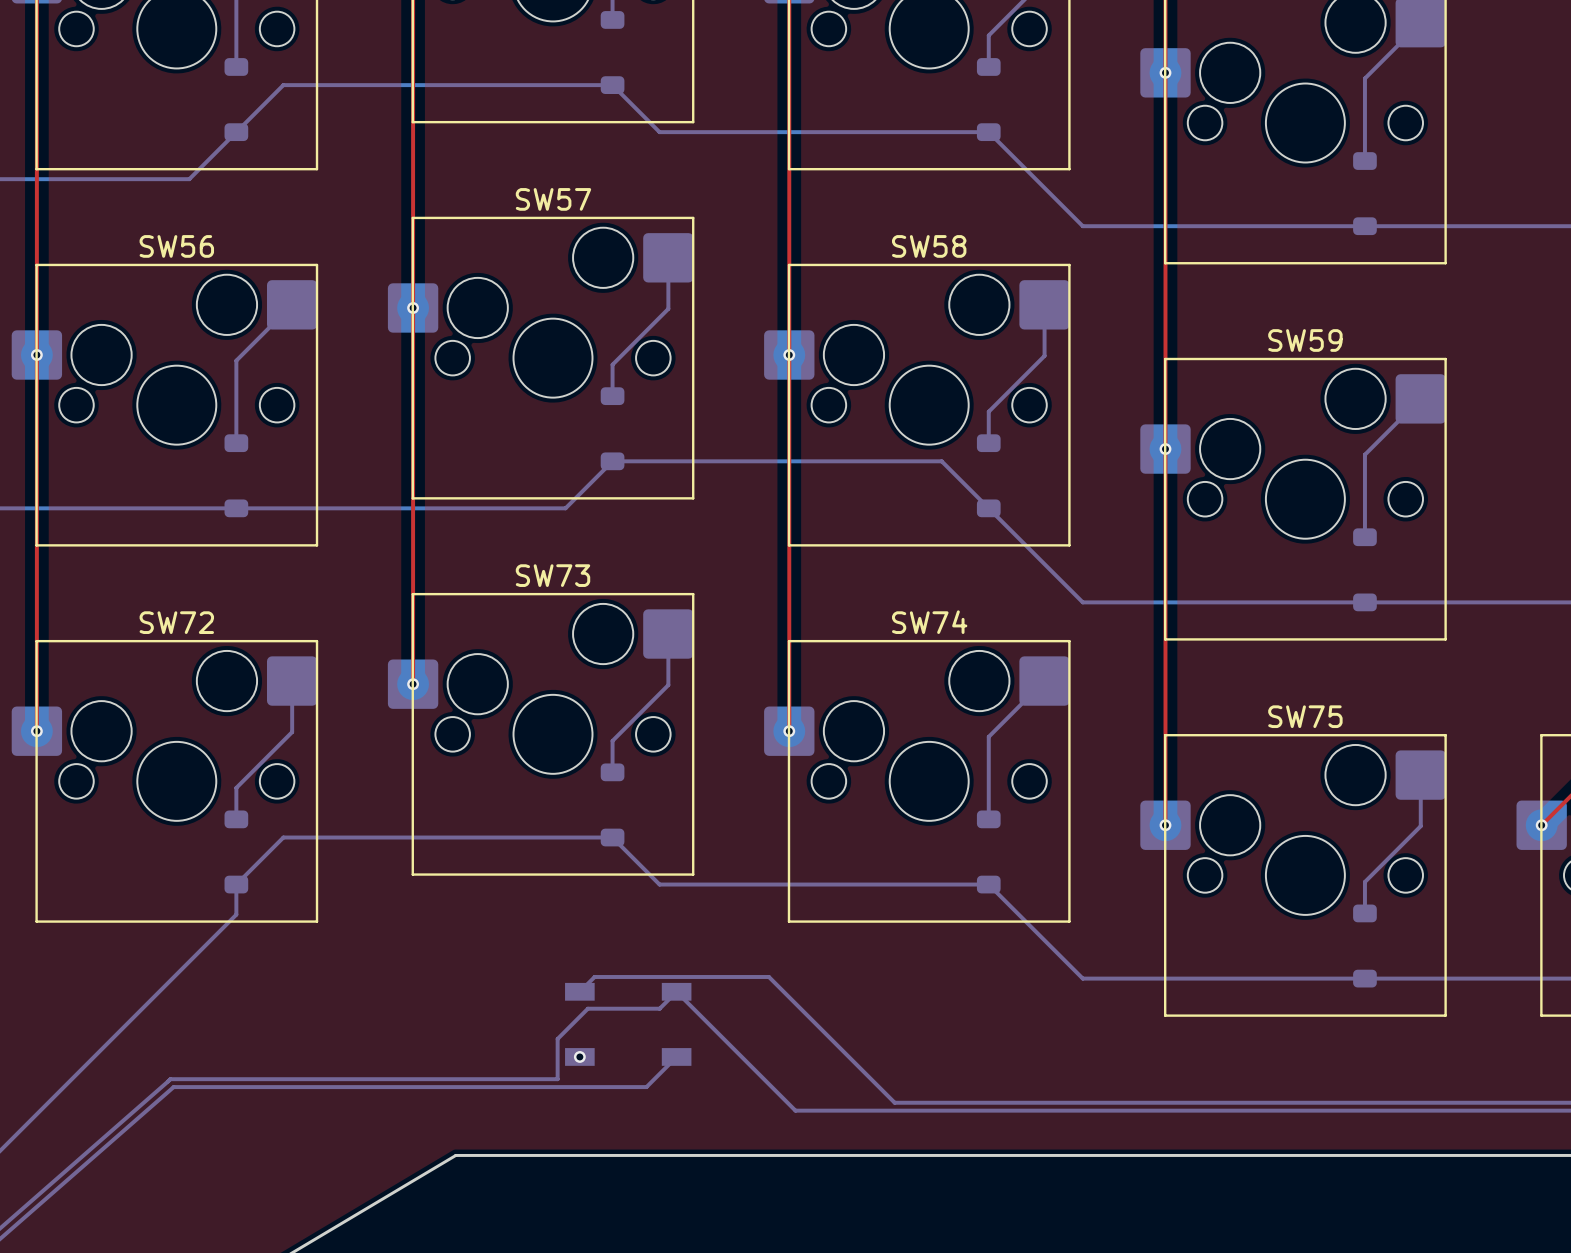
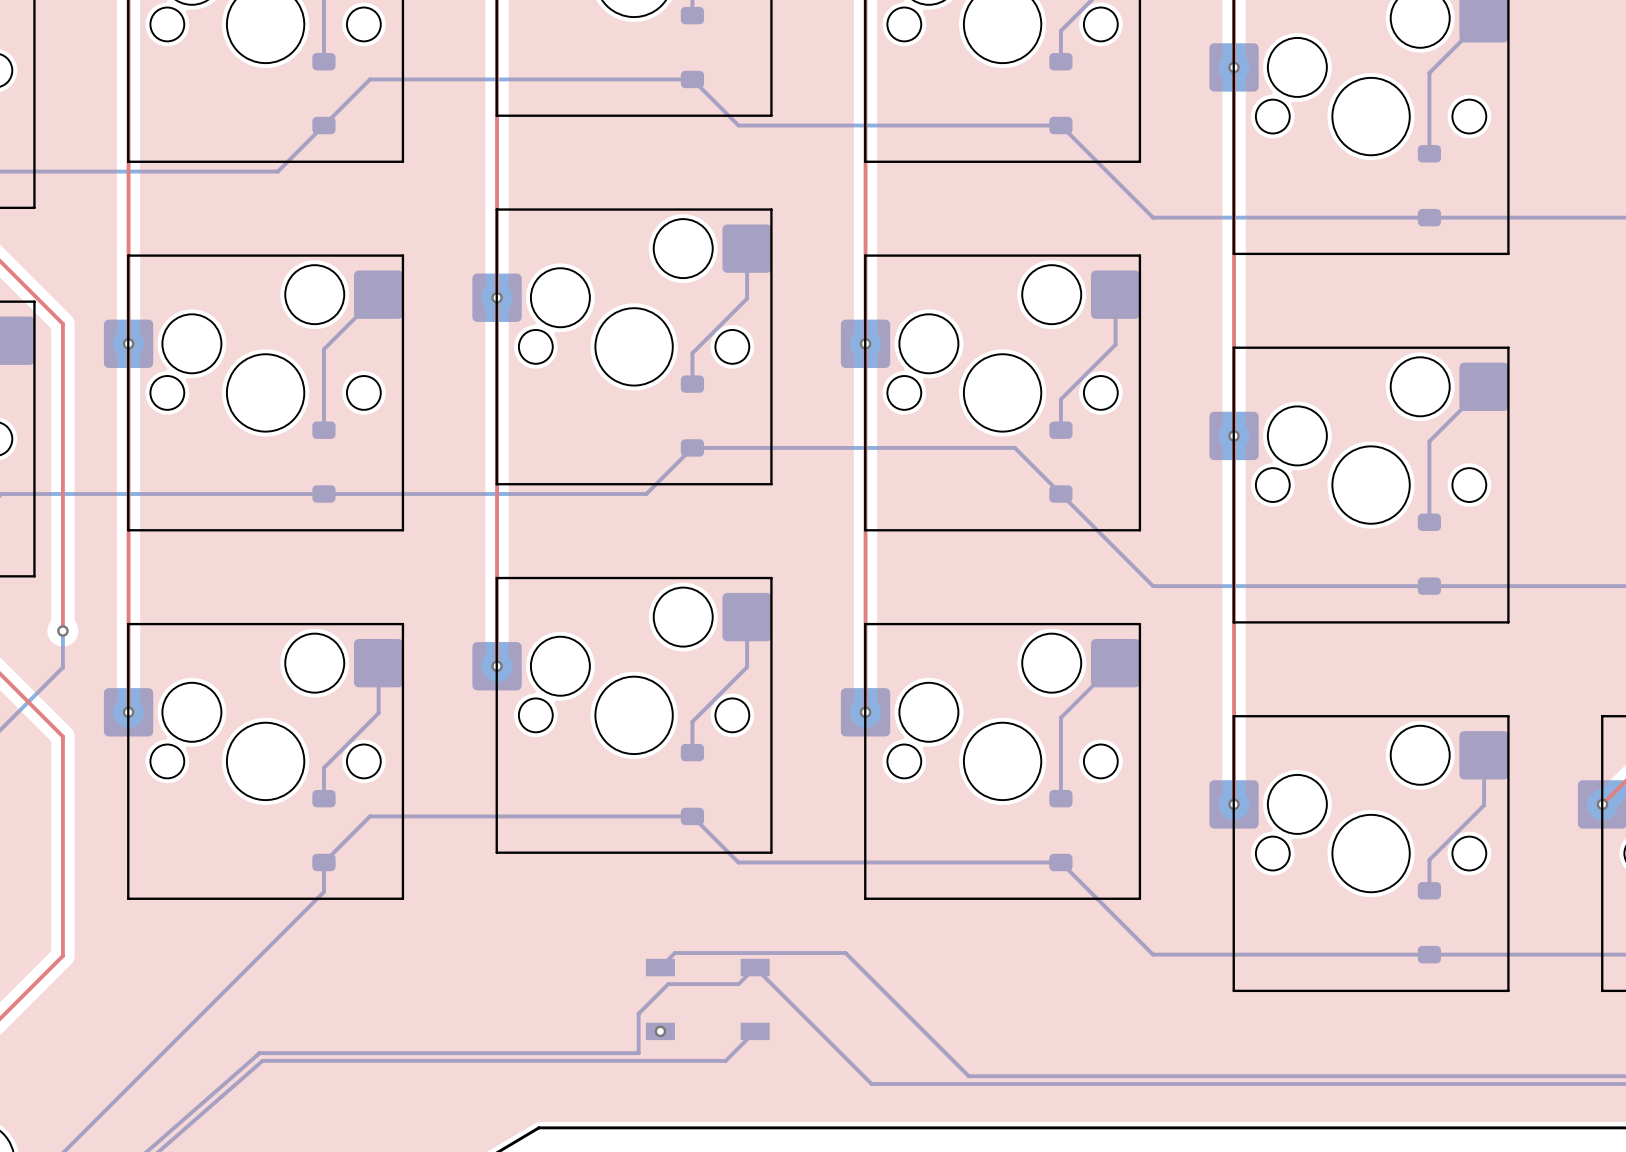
SW57 name: SW57 (553, 199) -> none
SW56 name: SW56 (176, 246) -> none
SW58 name: SW58 (929, 246) -> none
SW59 name: SW59 (1305, 340) -> none
SW73 name: SW73 (553, 575) -> none
SW72 name: SW72 (176, 622) -> none
SW74 name: SW74 (929, 622) -> none
SW75 name: SW75 (1305, 716) -> none

